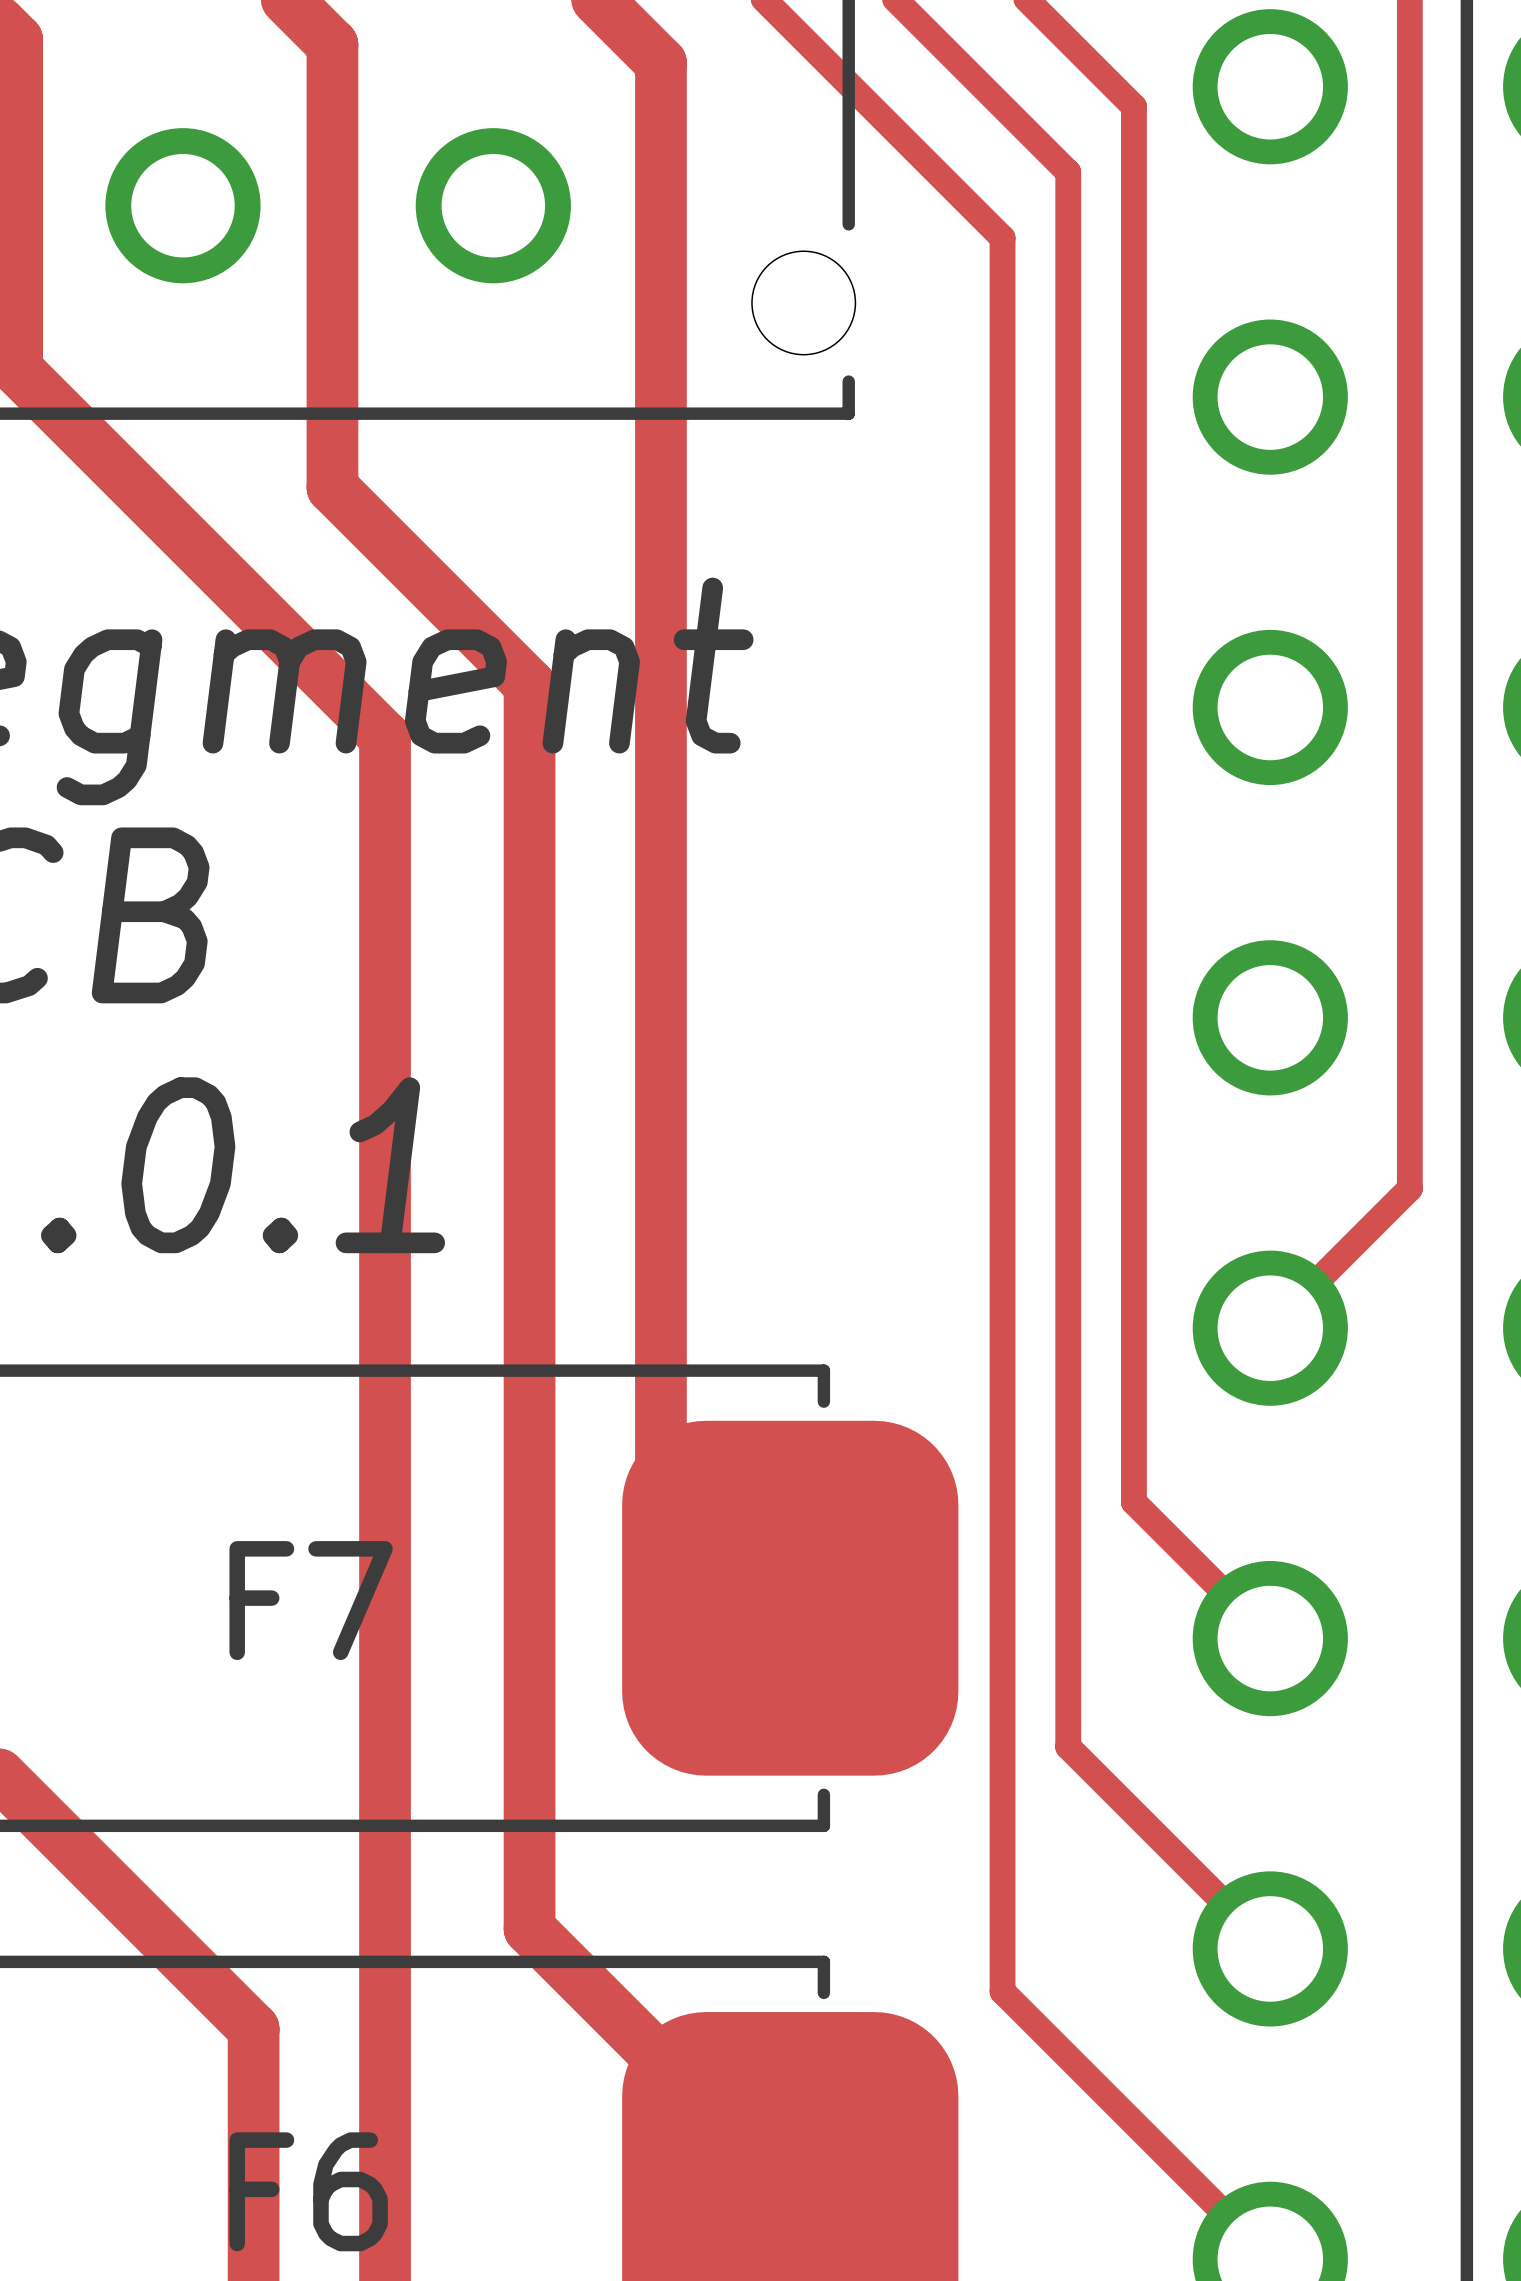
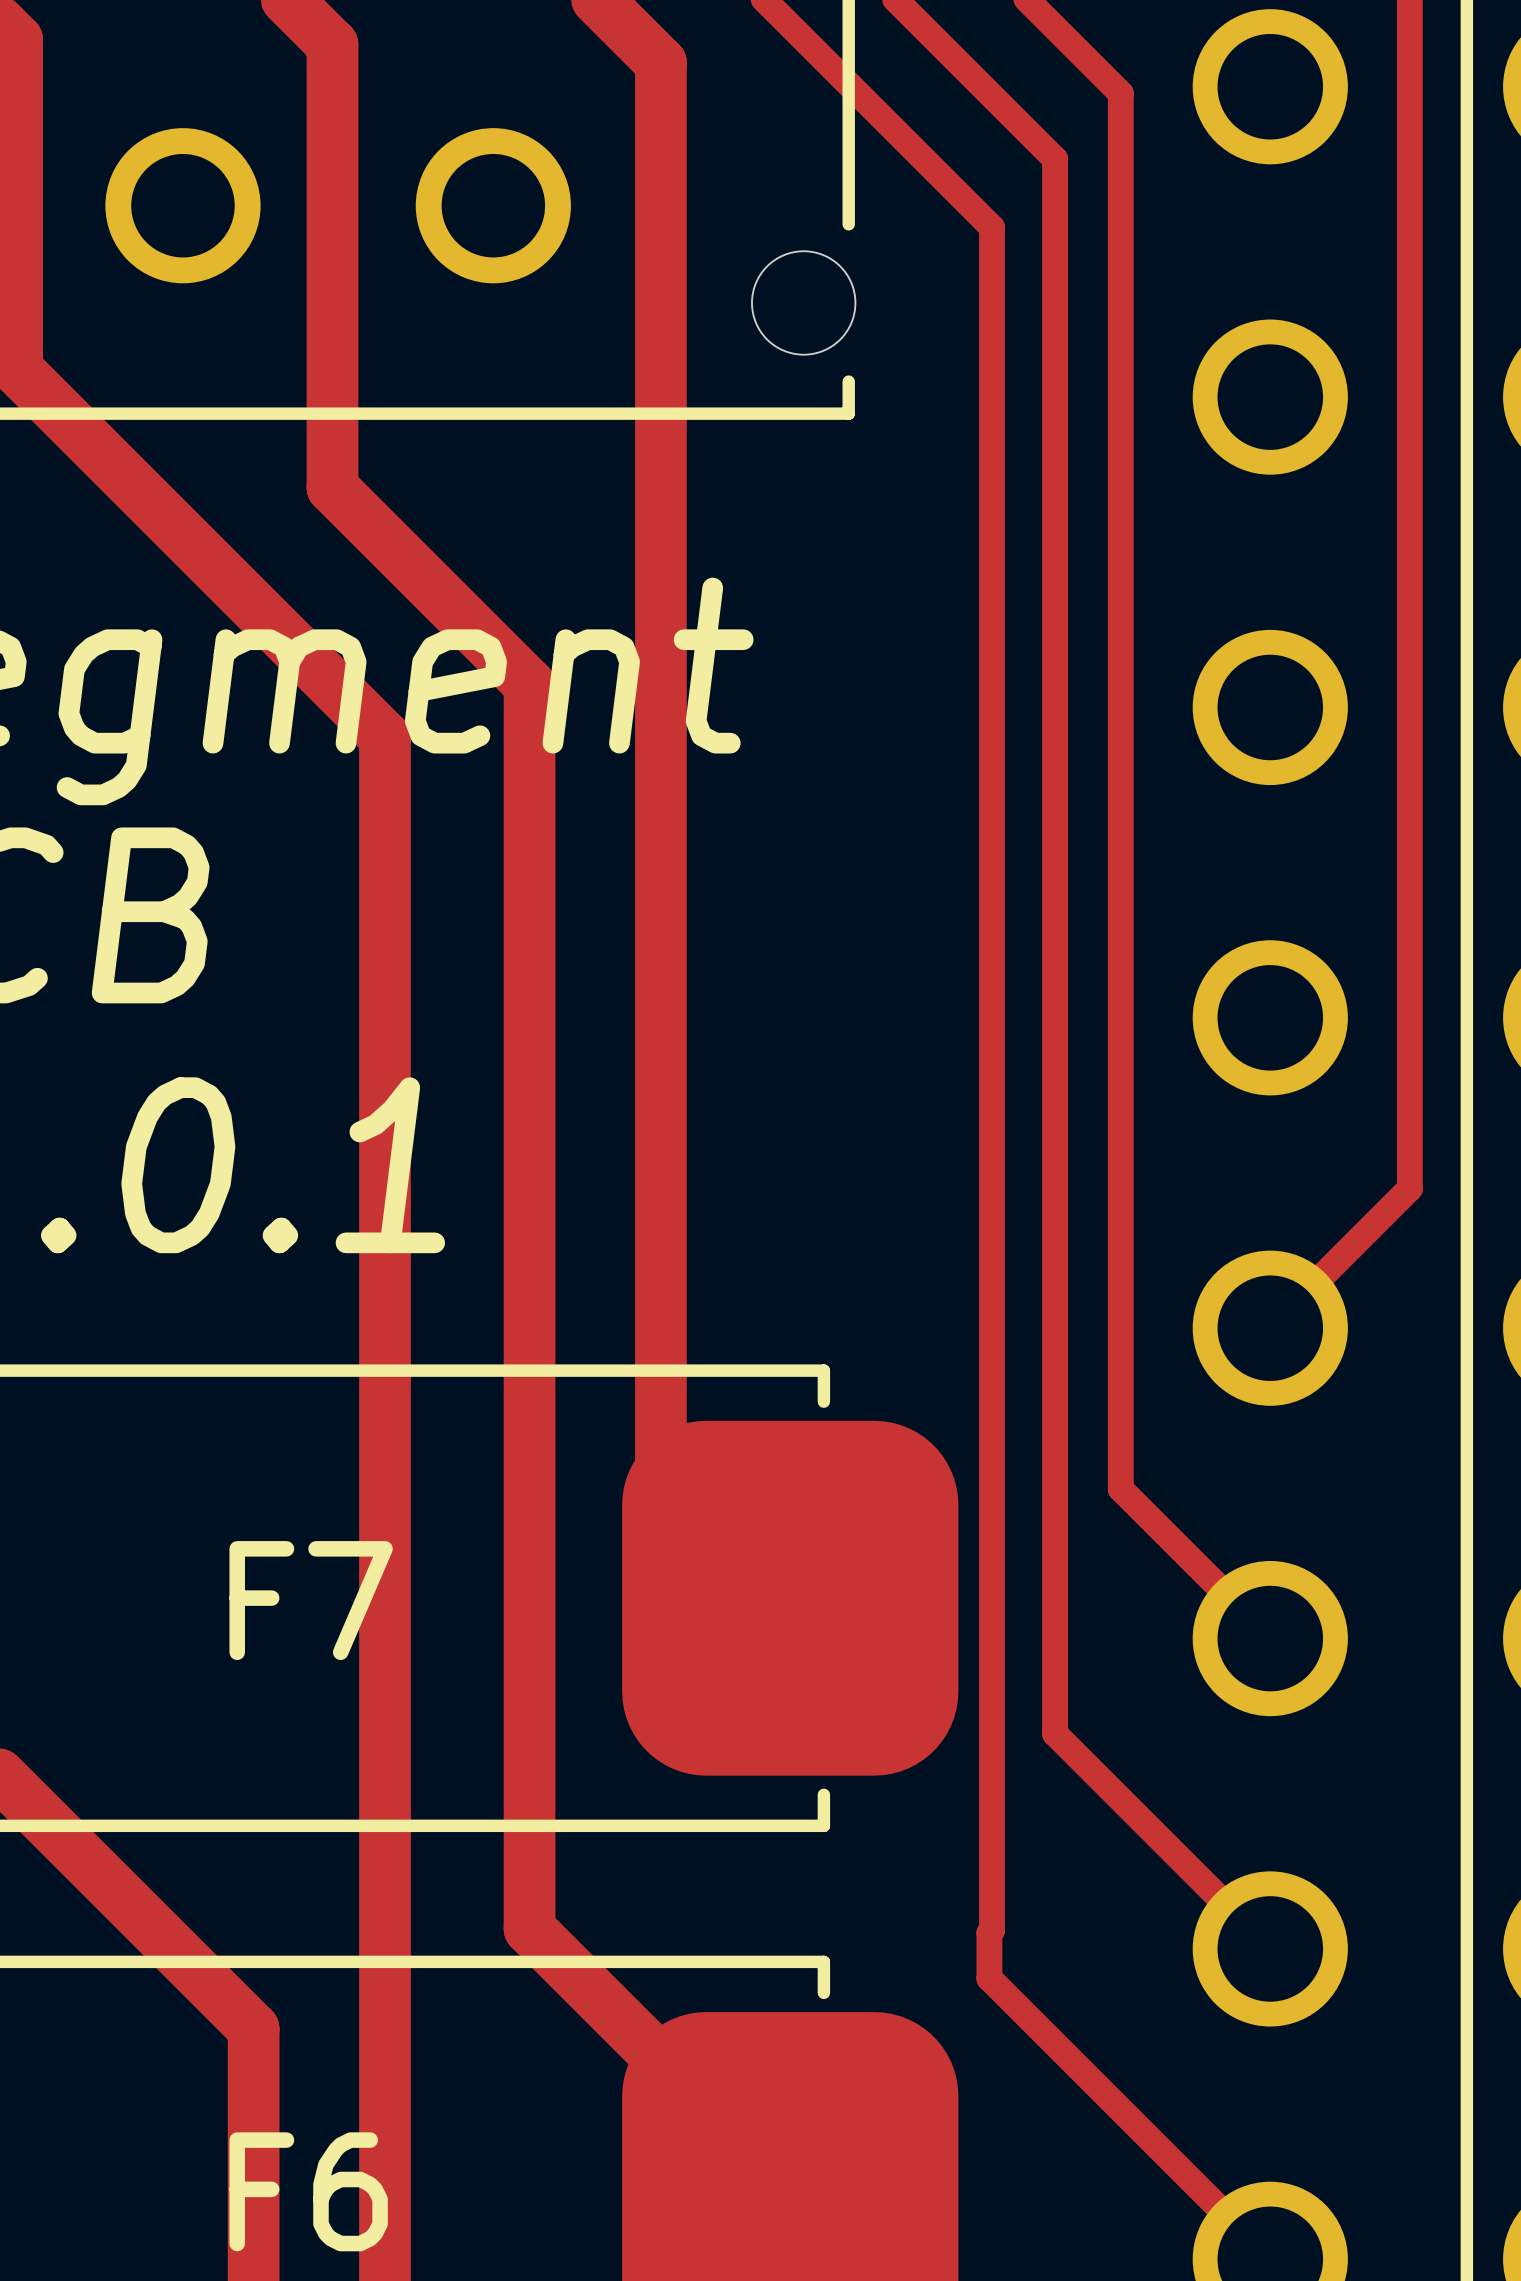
track: (1120, 93) (1133, 106) (1133, 1502) -> (1120, 93) (1120, 1489) (1133, 1502)
track: (1055, 159) (1068, 172) (1068, 1746) -> (1055, 159) (1055, 1733) (1068, 1746)
track: (992, 227) (1002, 237) (1002, 1991) -> (992, 227) (992, 1930) (989, 1932) (989, 1978) (1002, 1991)

